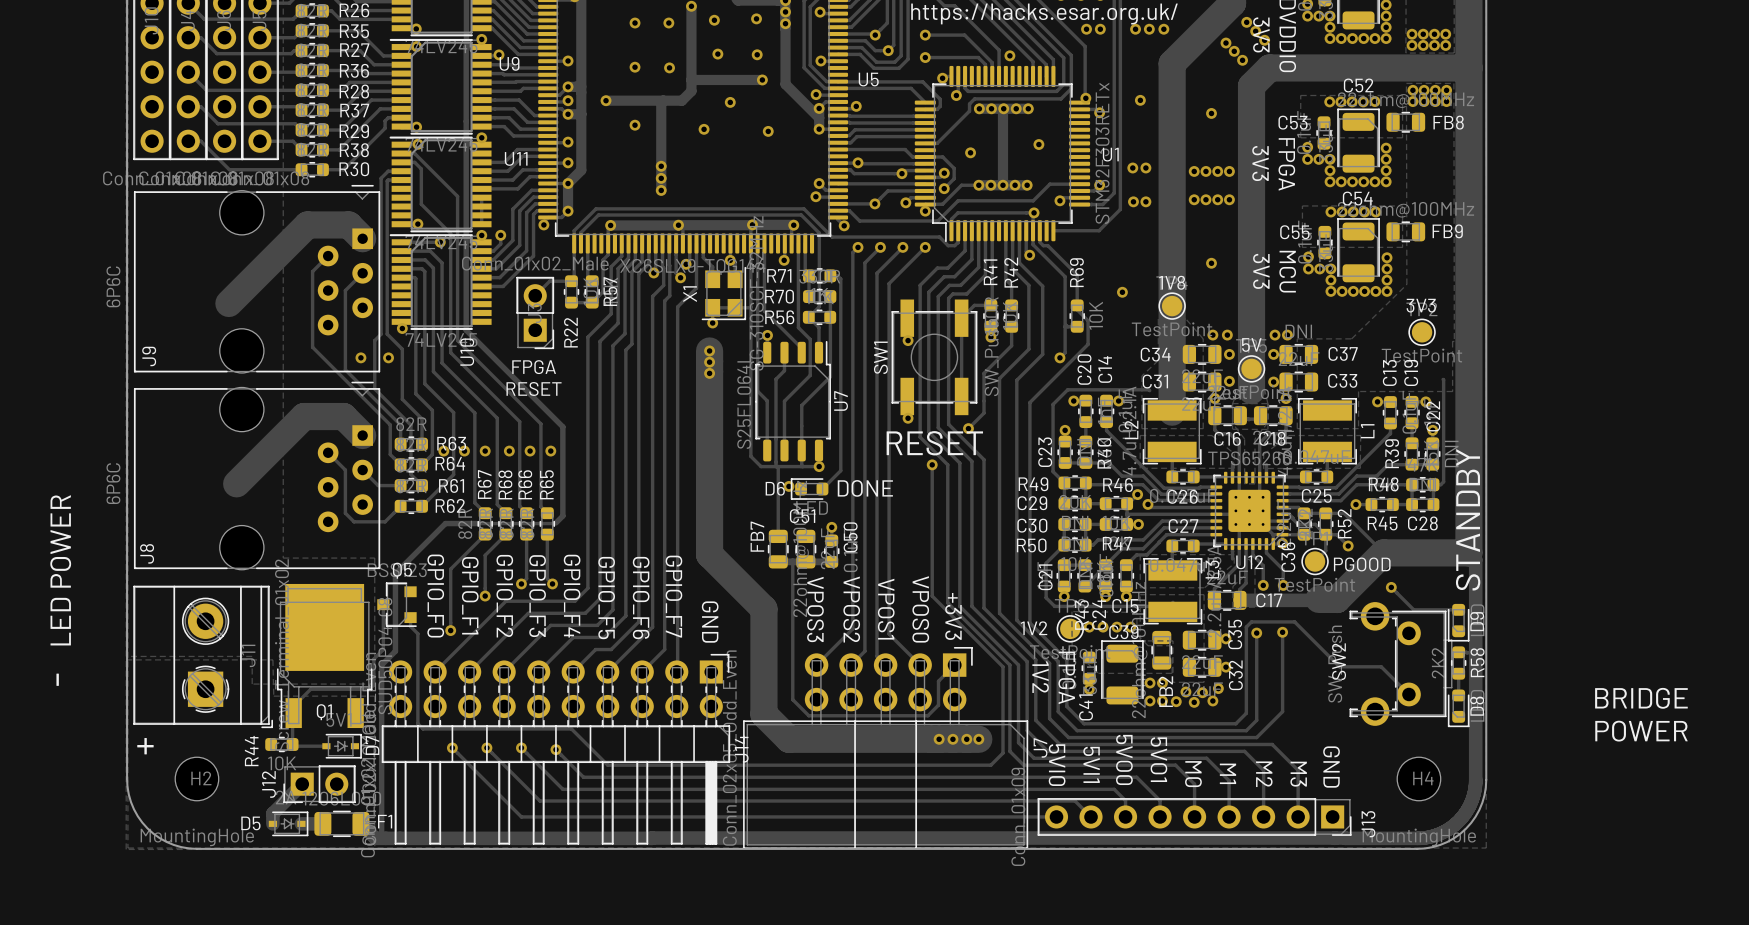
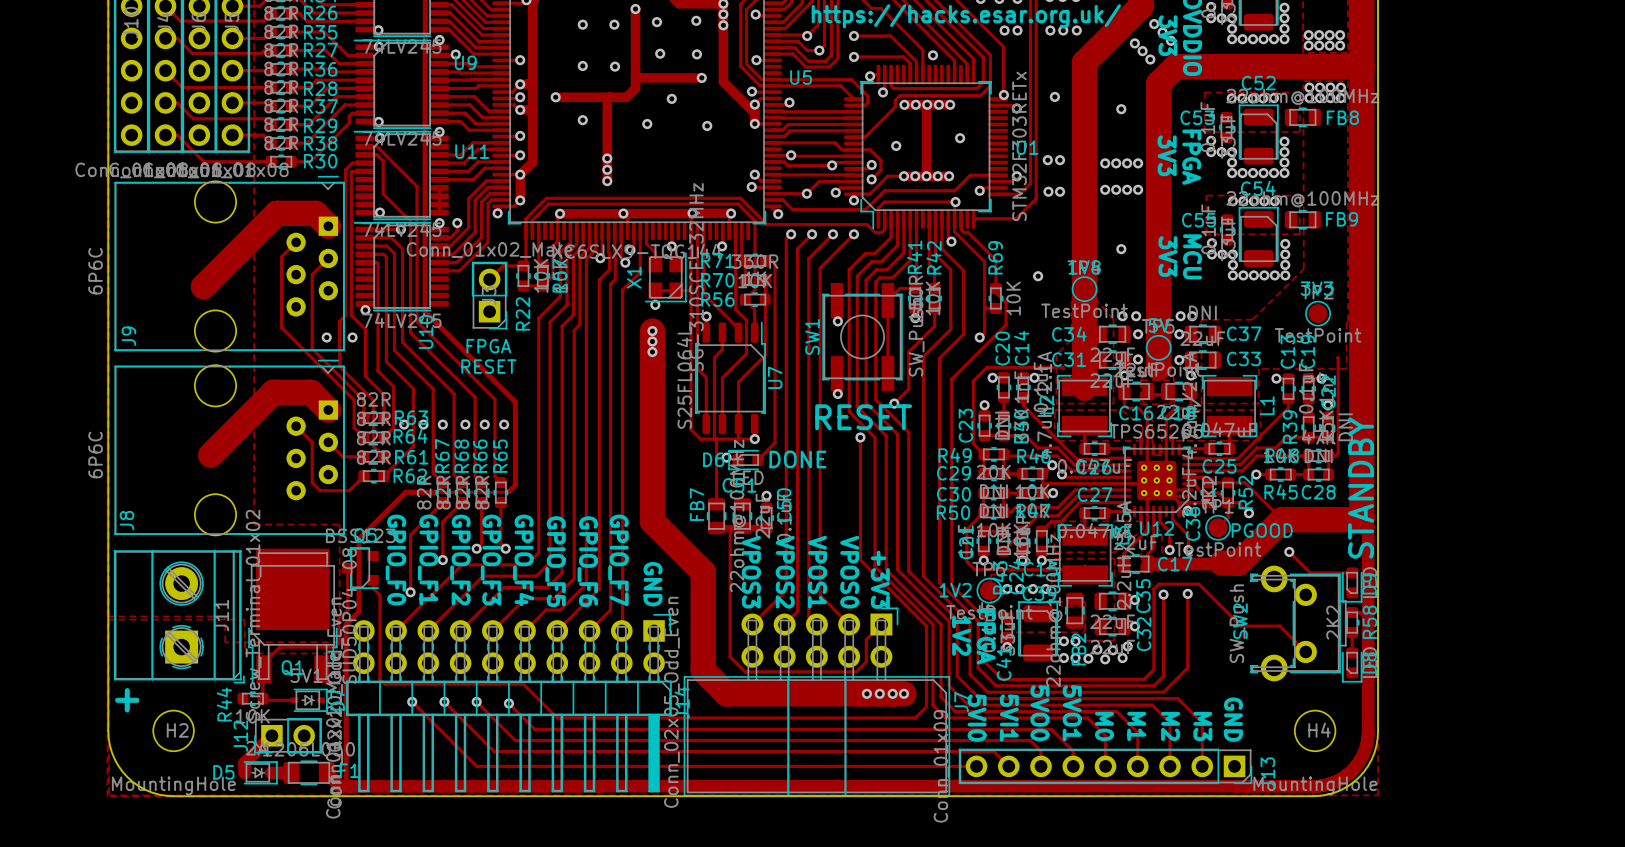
text: LED POWER (60, 570) -> none
text: - (57, 679) -> none
text: BRIDGE (1641, 698) -> none
text: POWER (1641, 731) -> none

